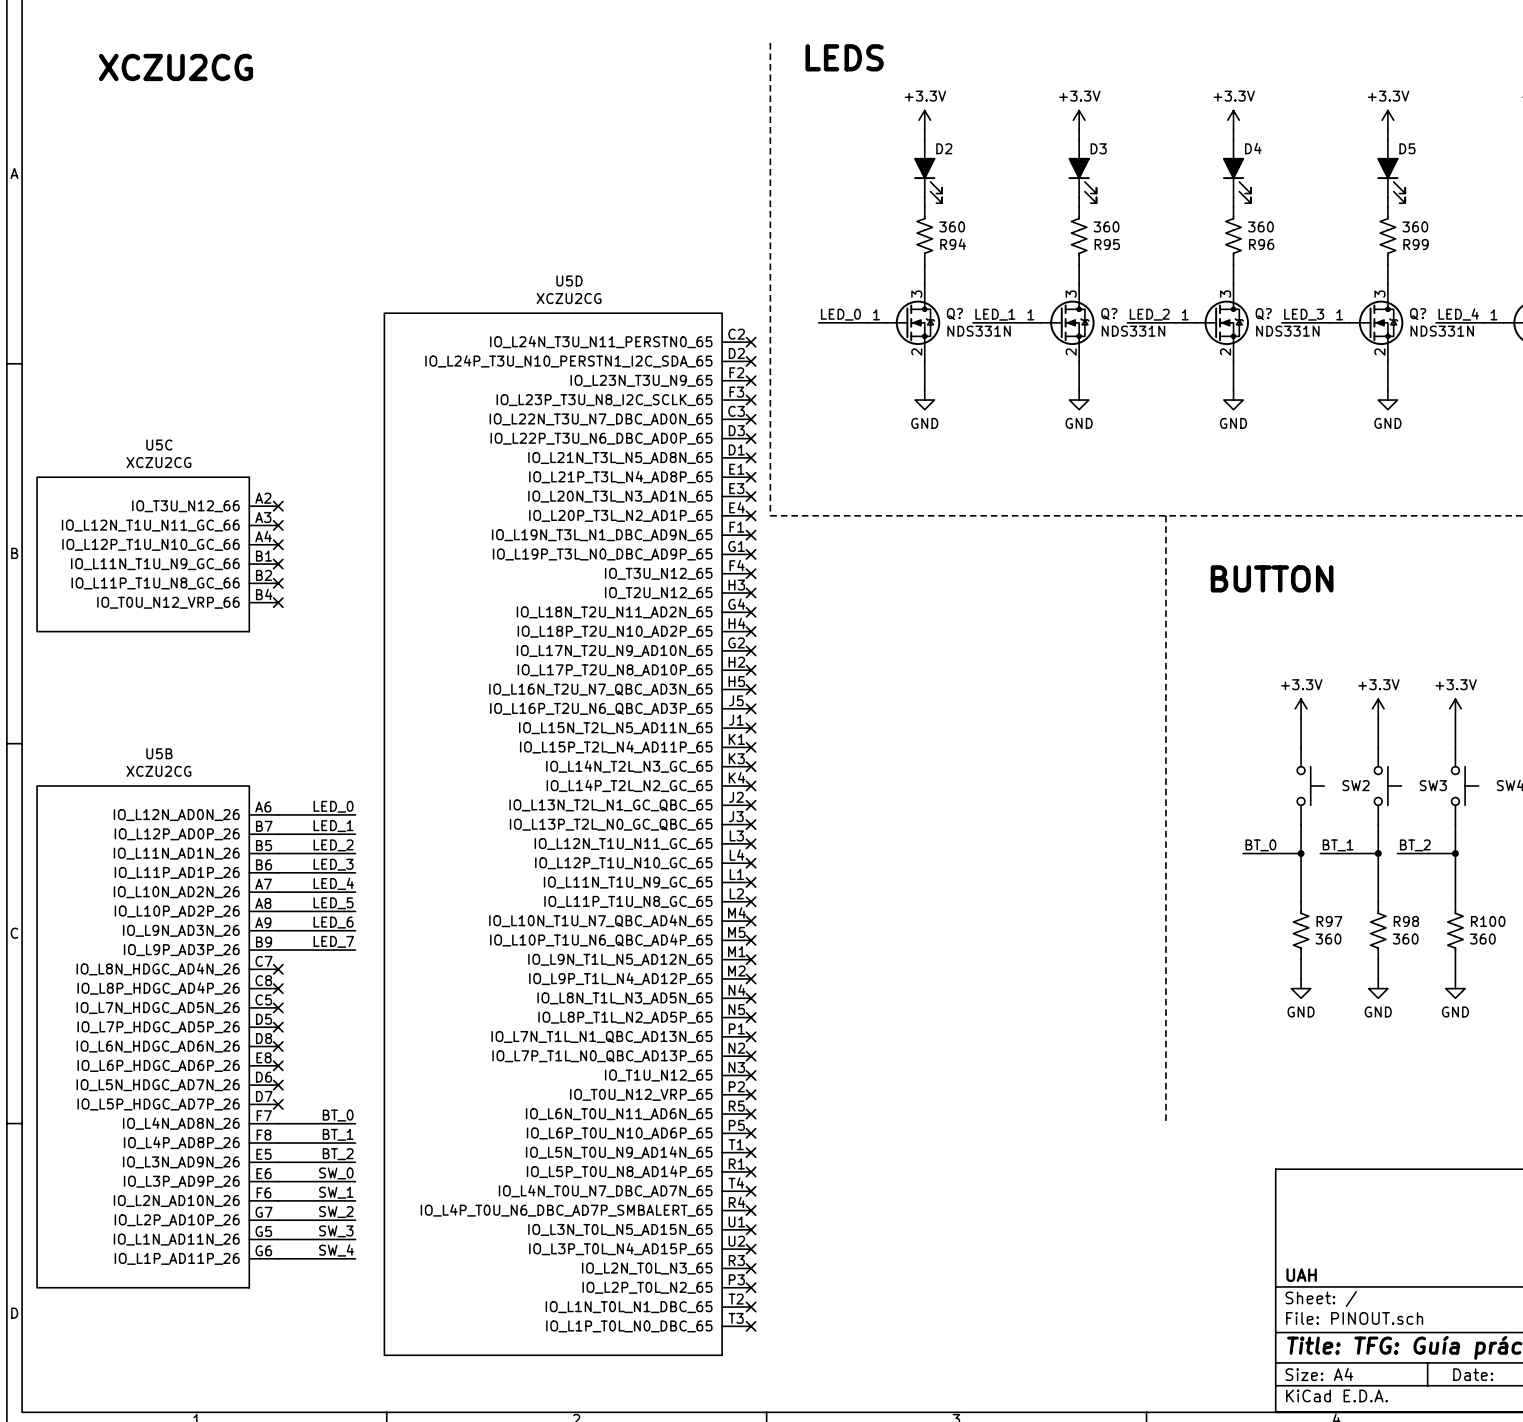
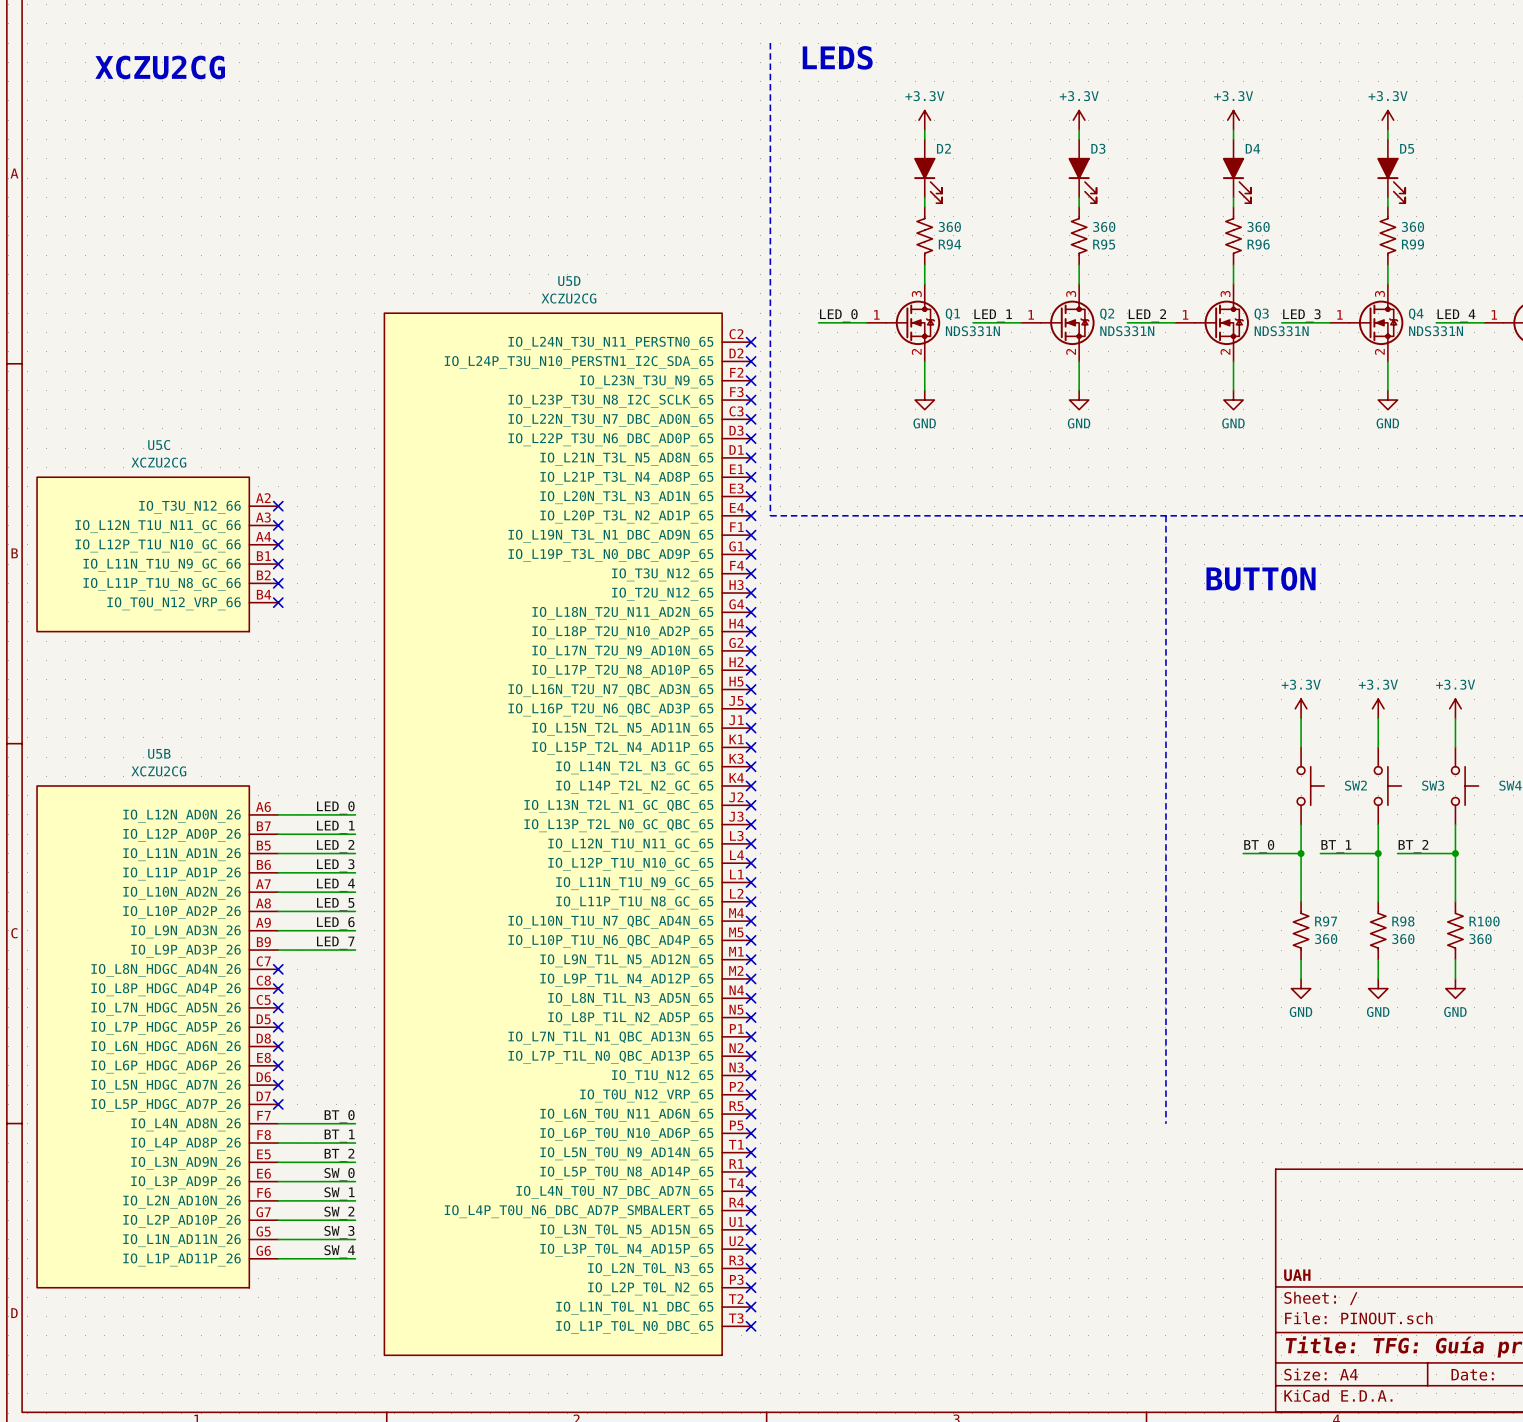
Q? name: Q? (954, 314) -> Q1 (952, 314)
Q? name: Q? (1109, 314) -> Q2 (1107, 314)
Q? name: Q? (1263, 314) -> Q3 (1261, 314)
Q? name: Q? (1418, 314) -> Q4 (1416, 314)

